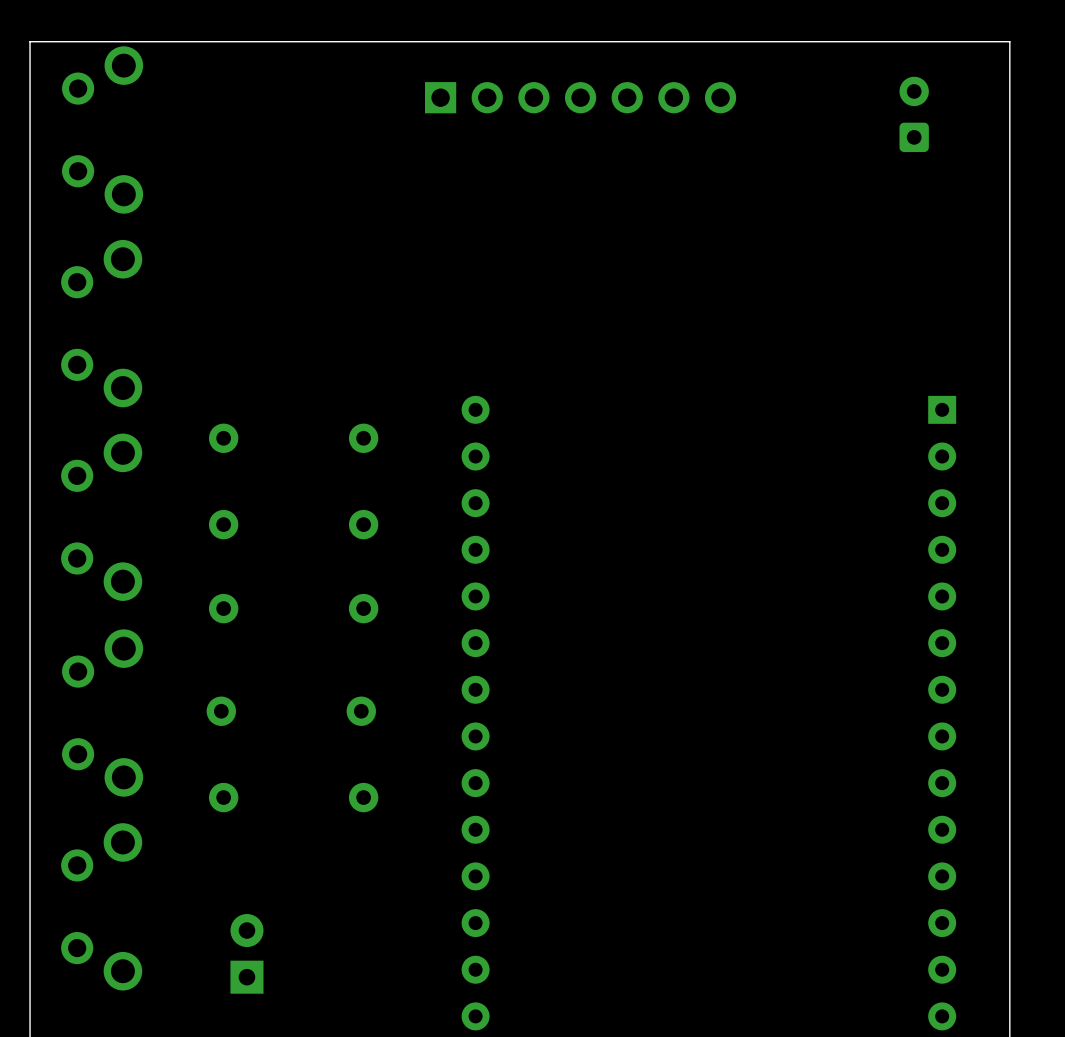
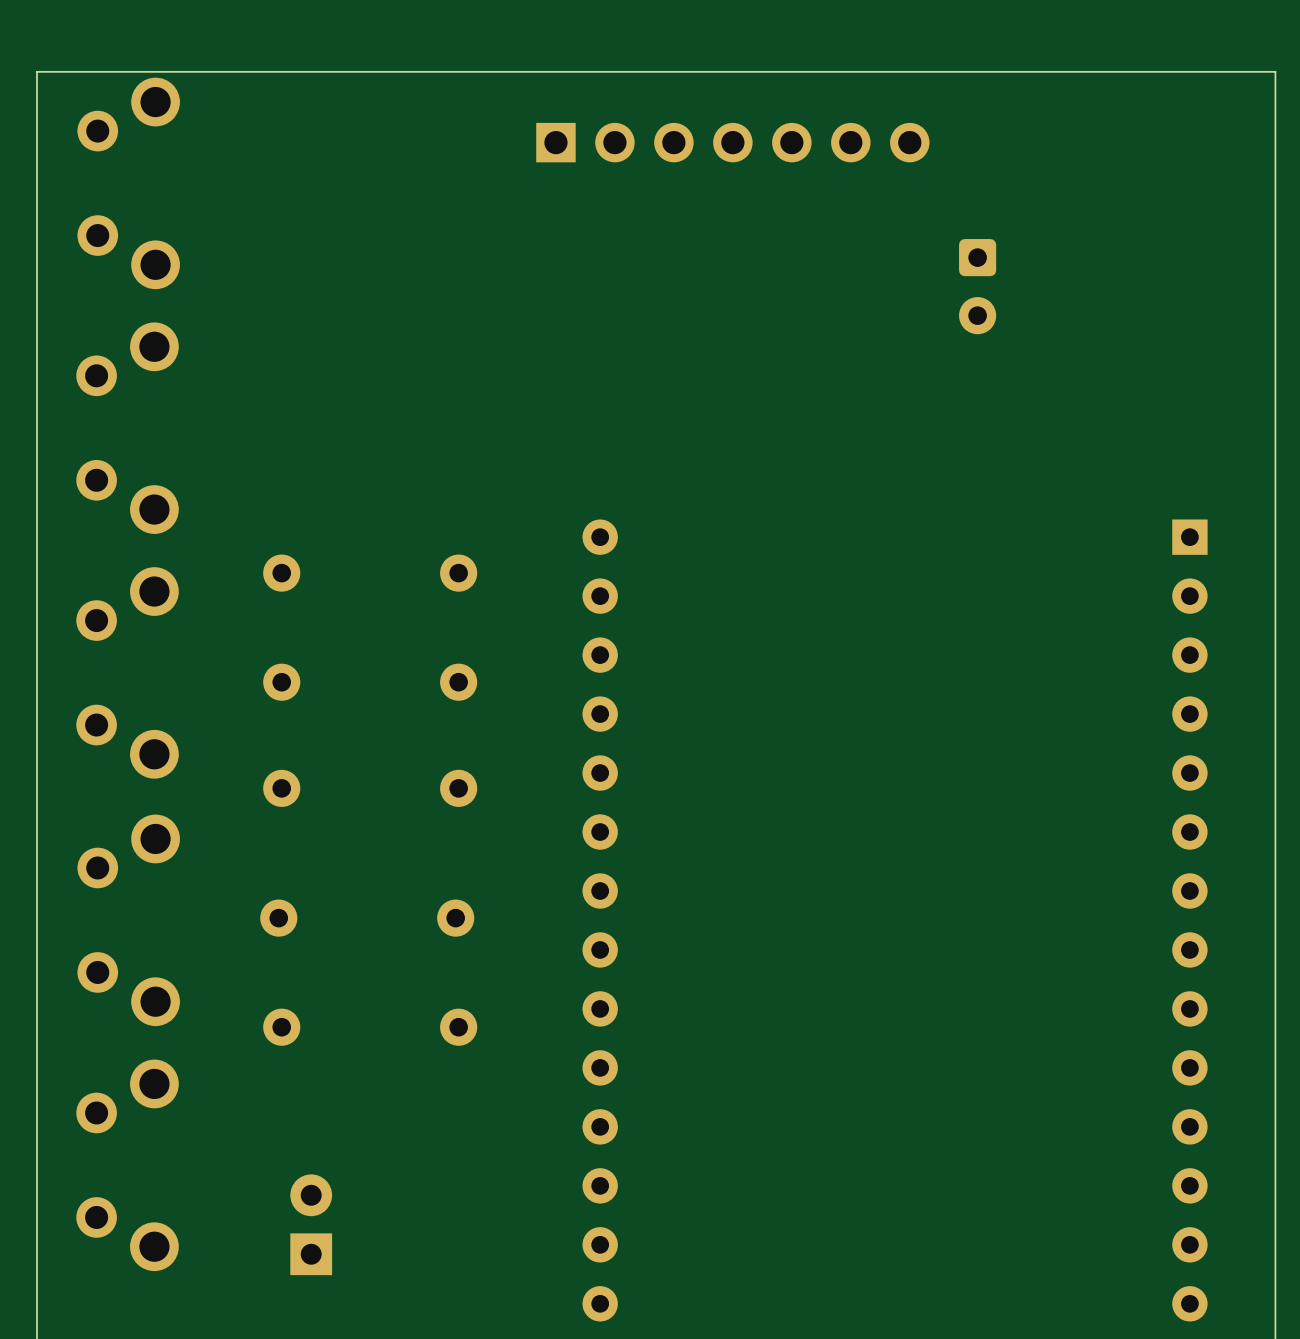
part rotation: 0° (914, 114) -> 180° (977, 286)
part position: (914, 114) -> (977, 286)

